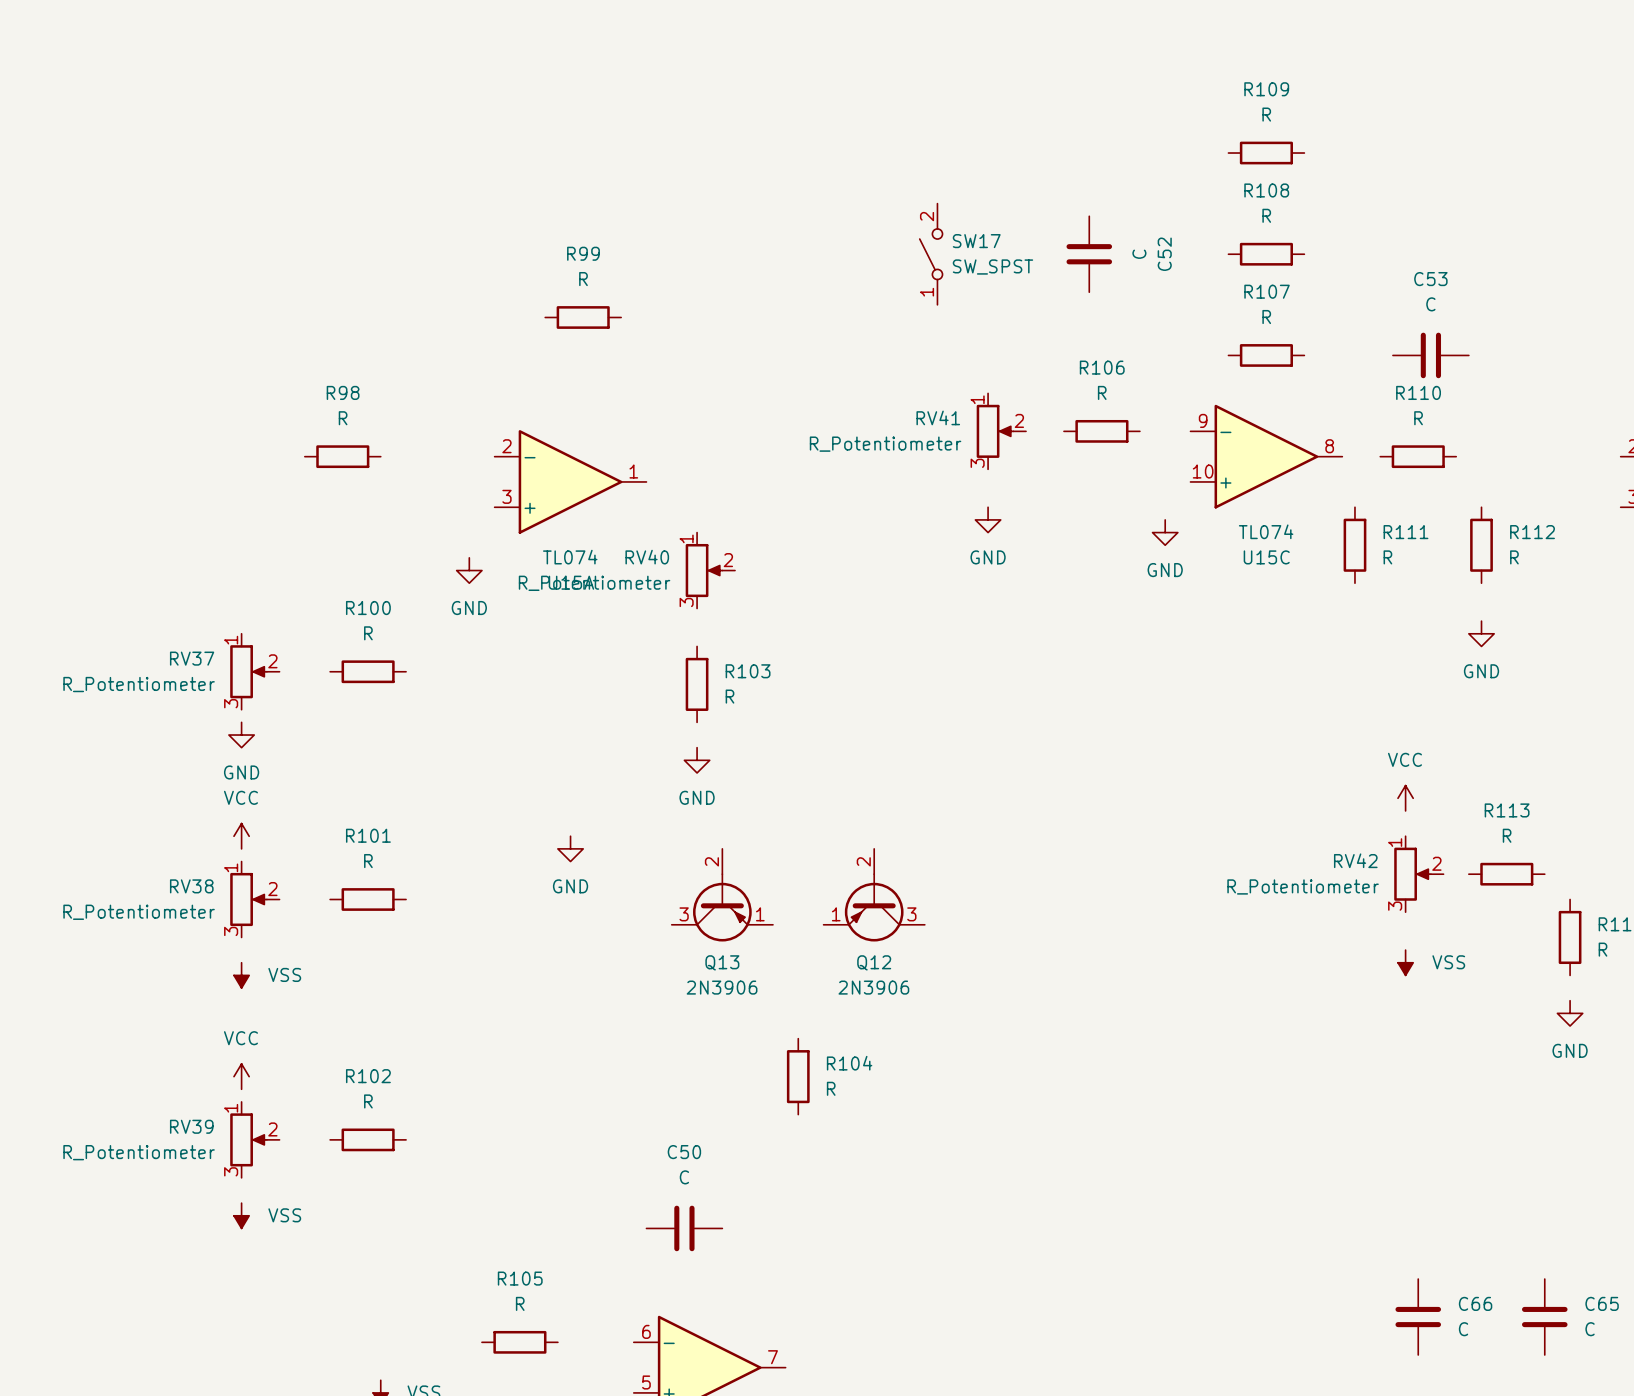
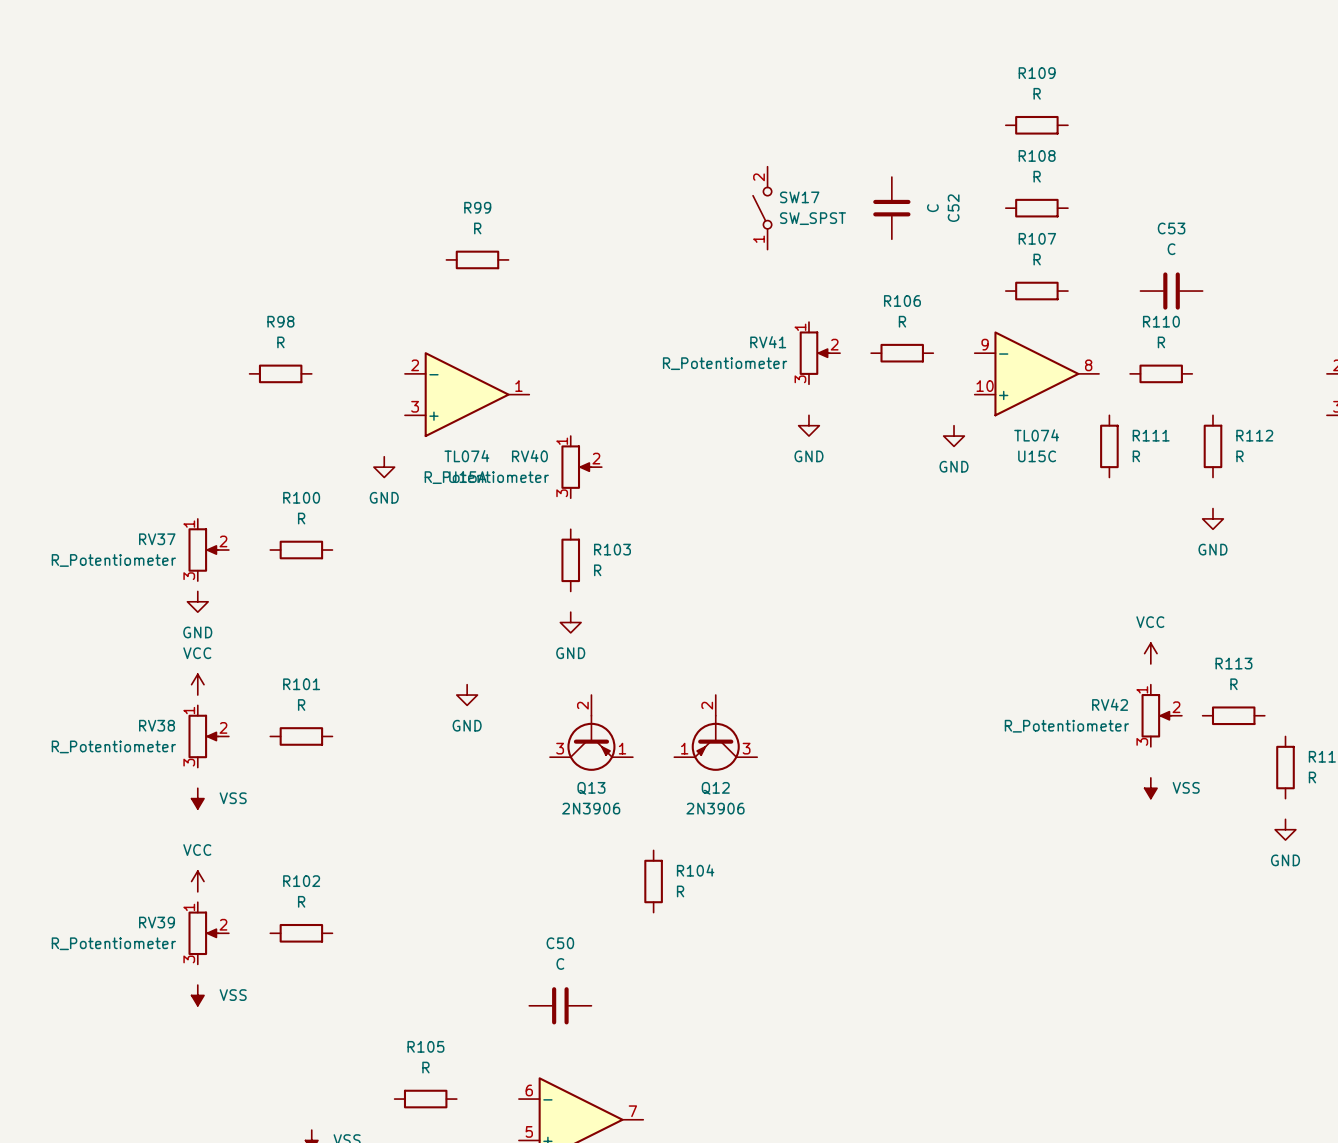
C66: C (1418, 1317) -> none
C65: C (1544, 1317) -> none

